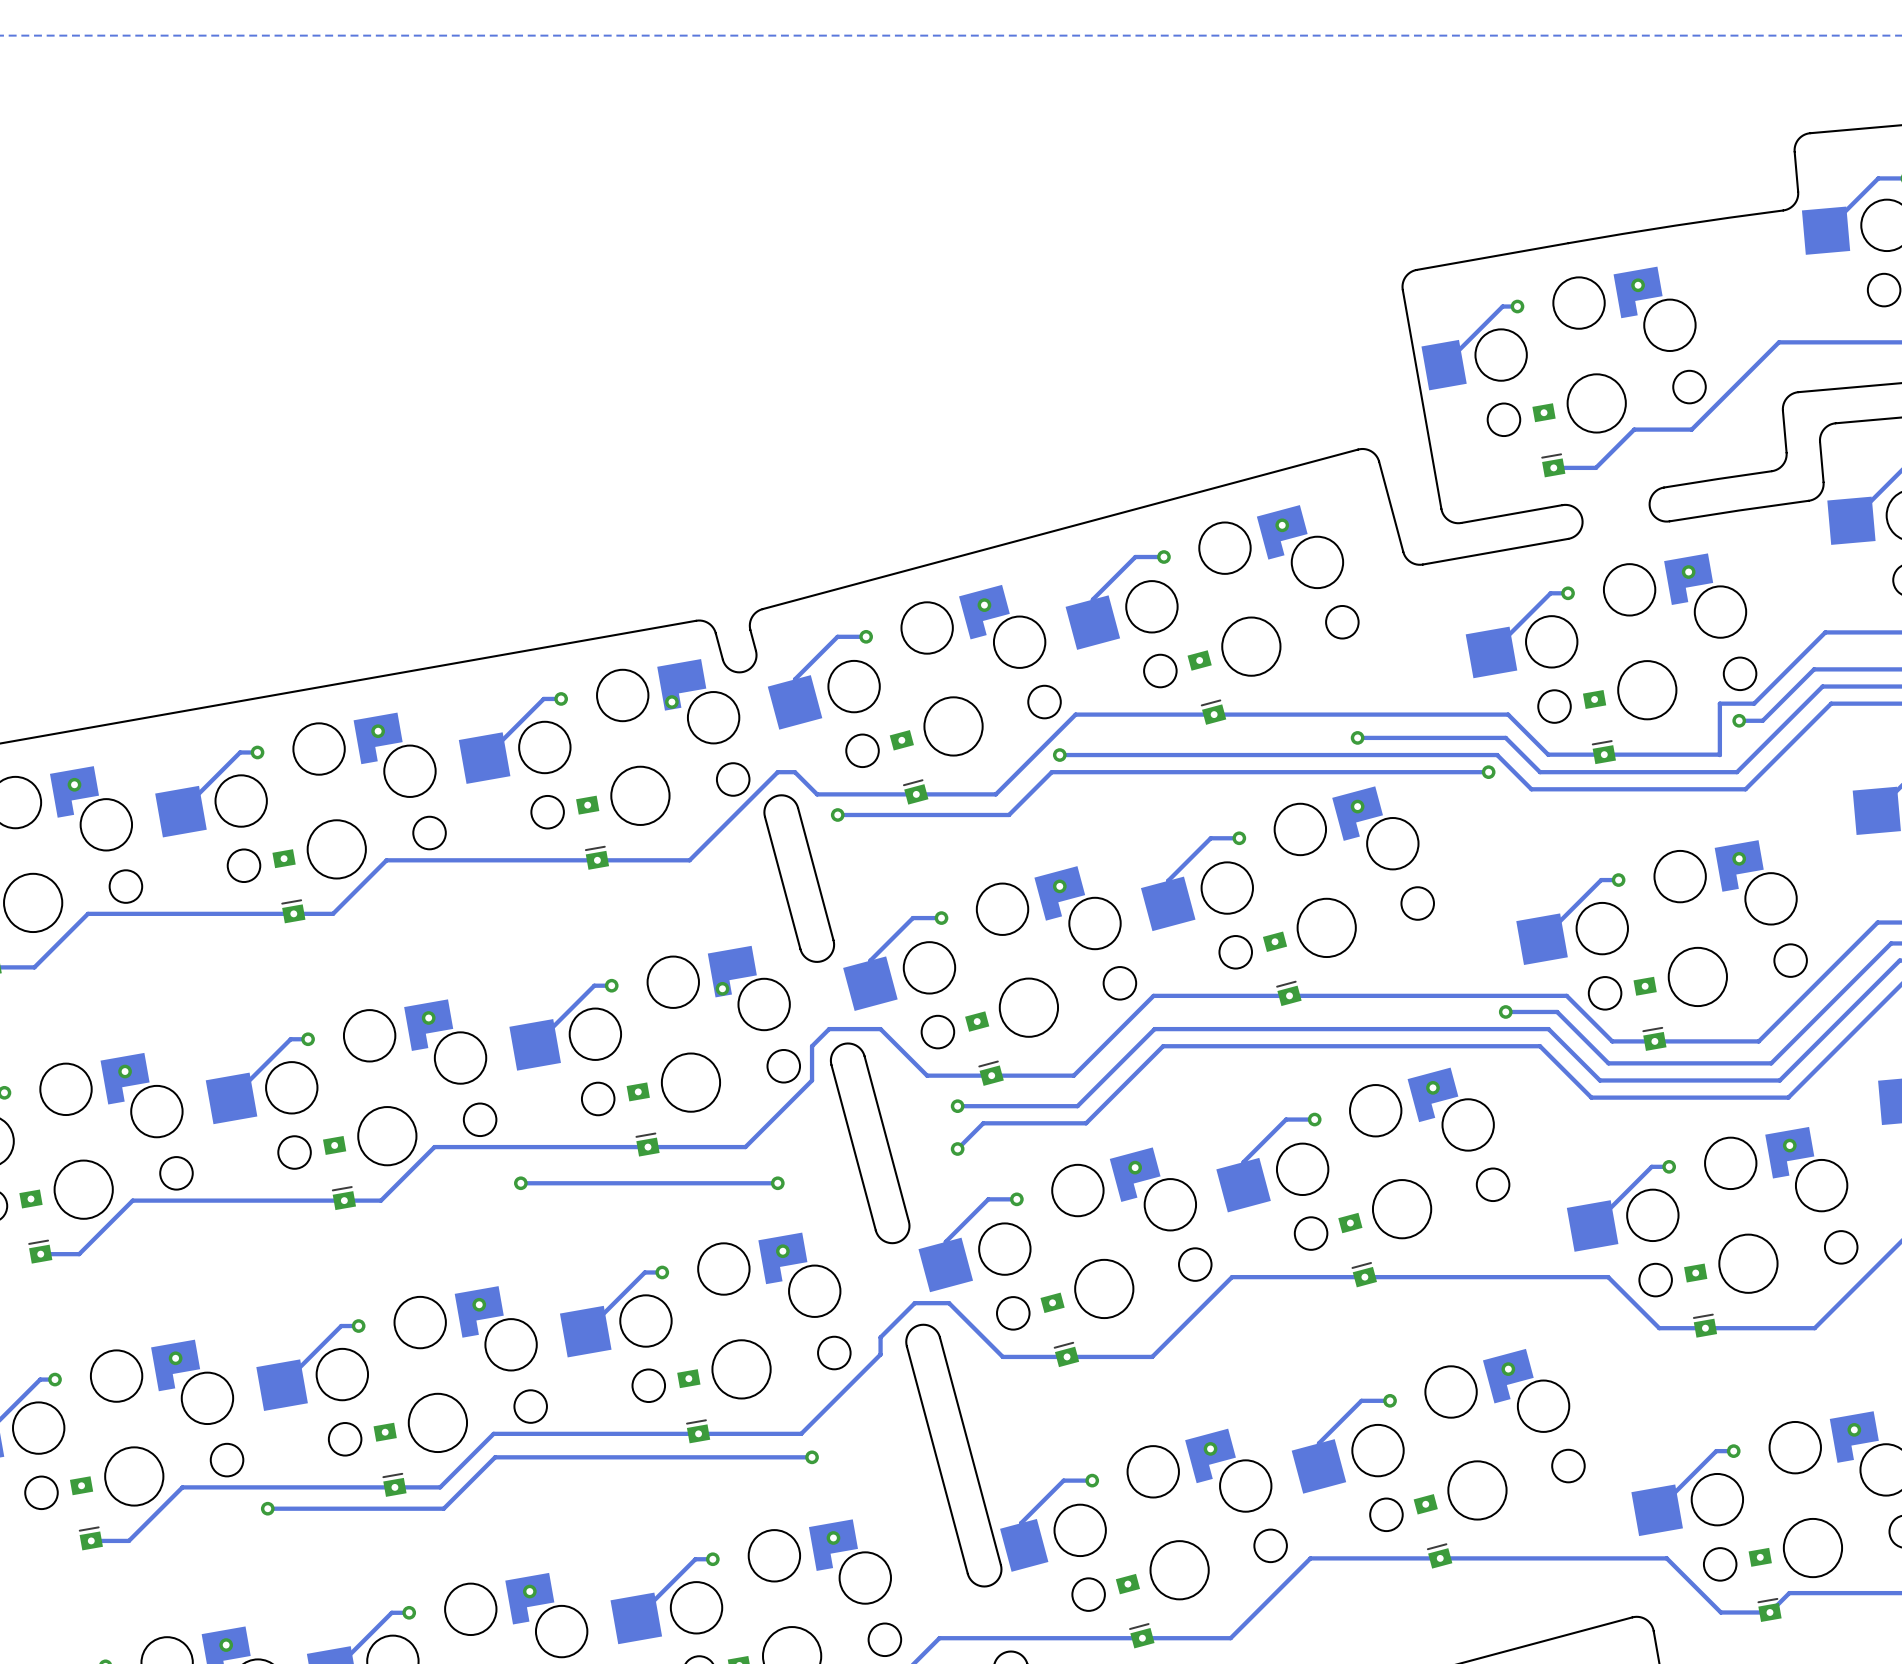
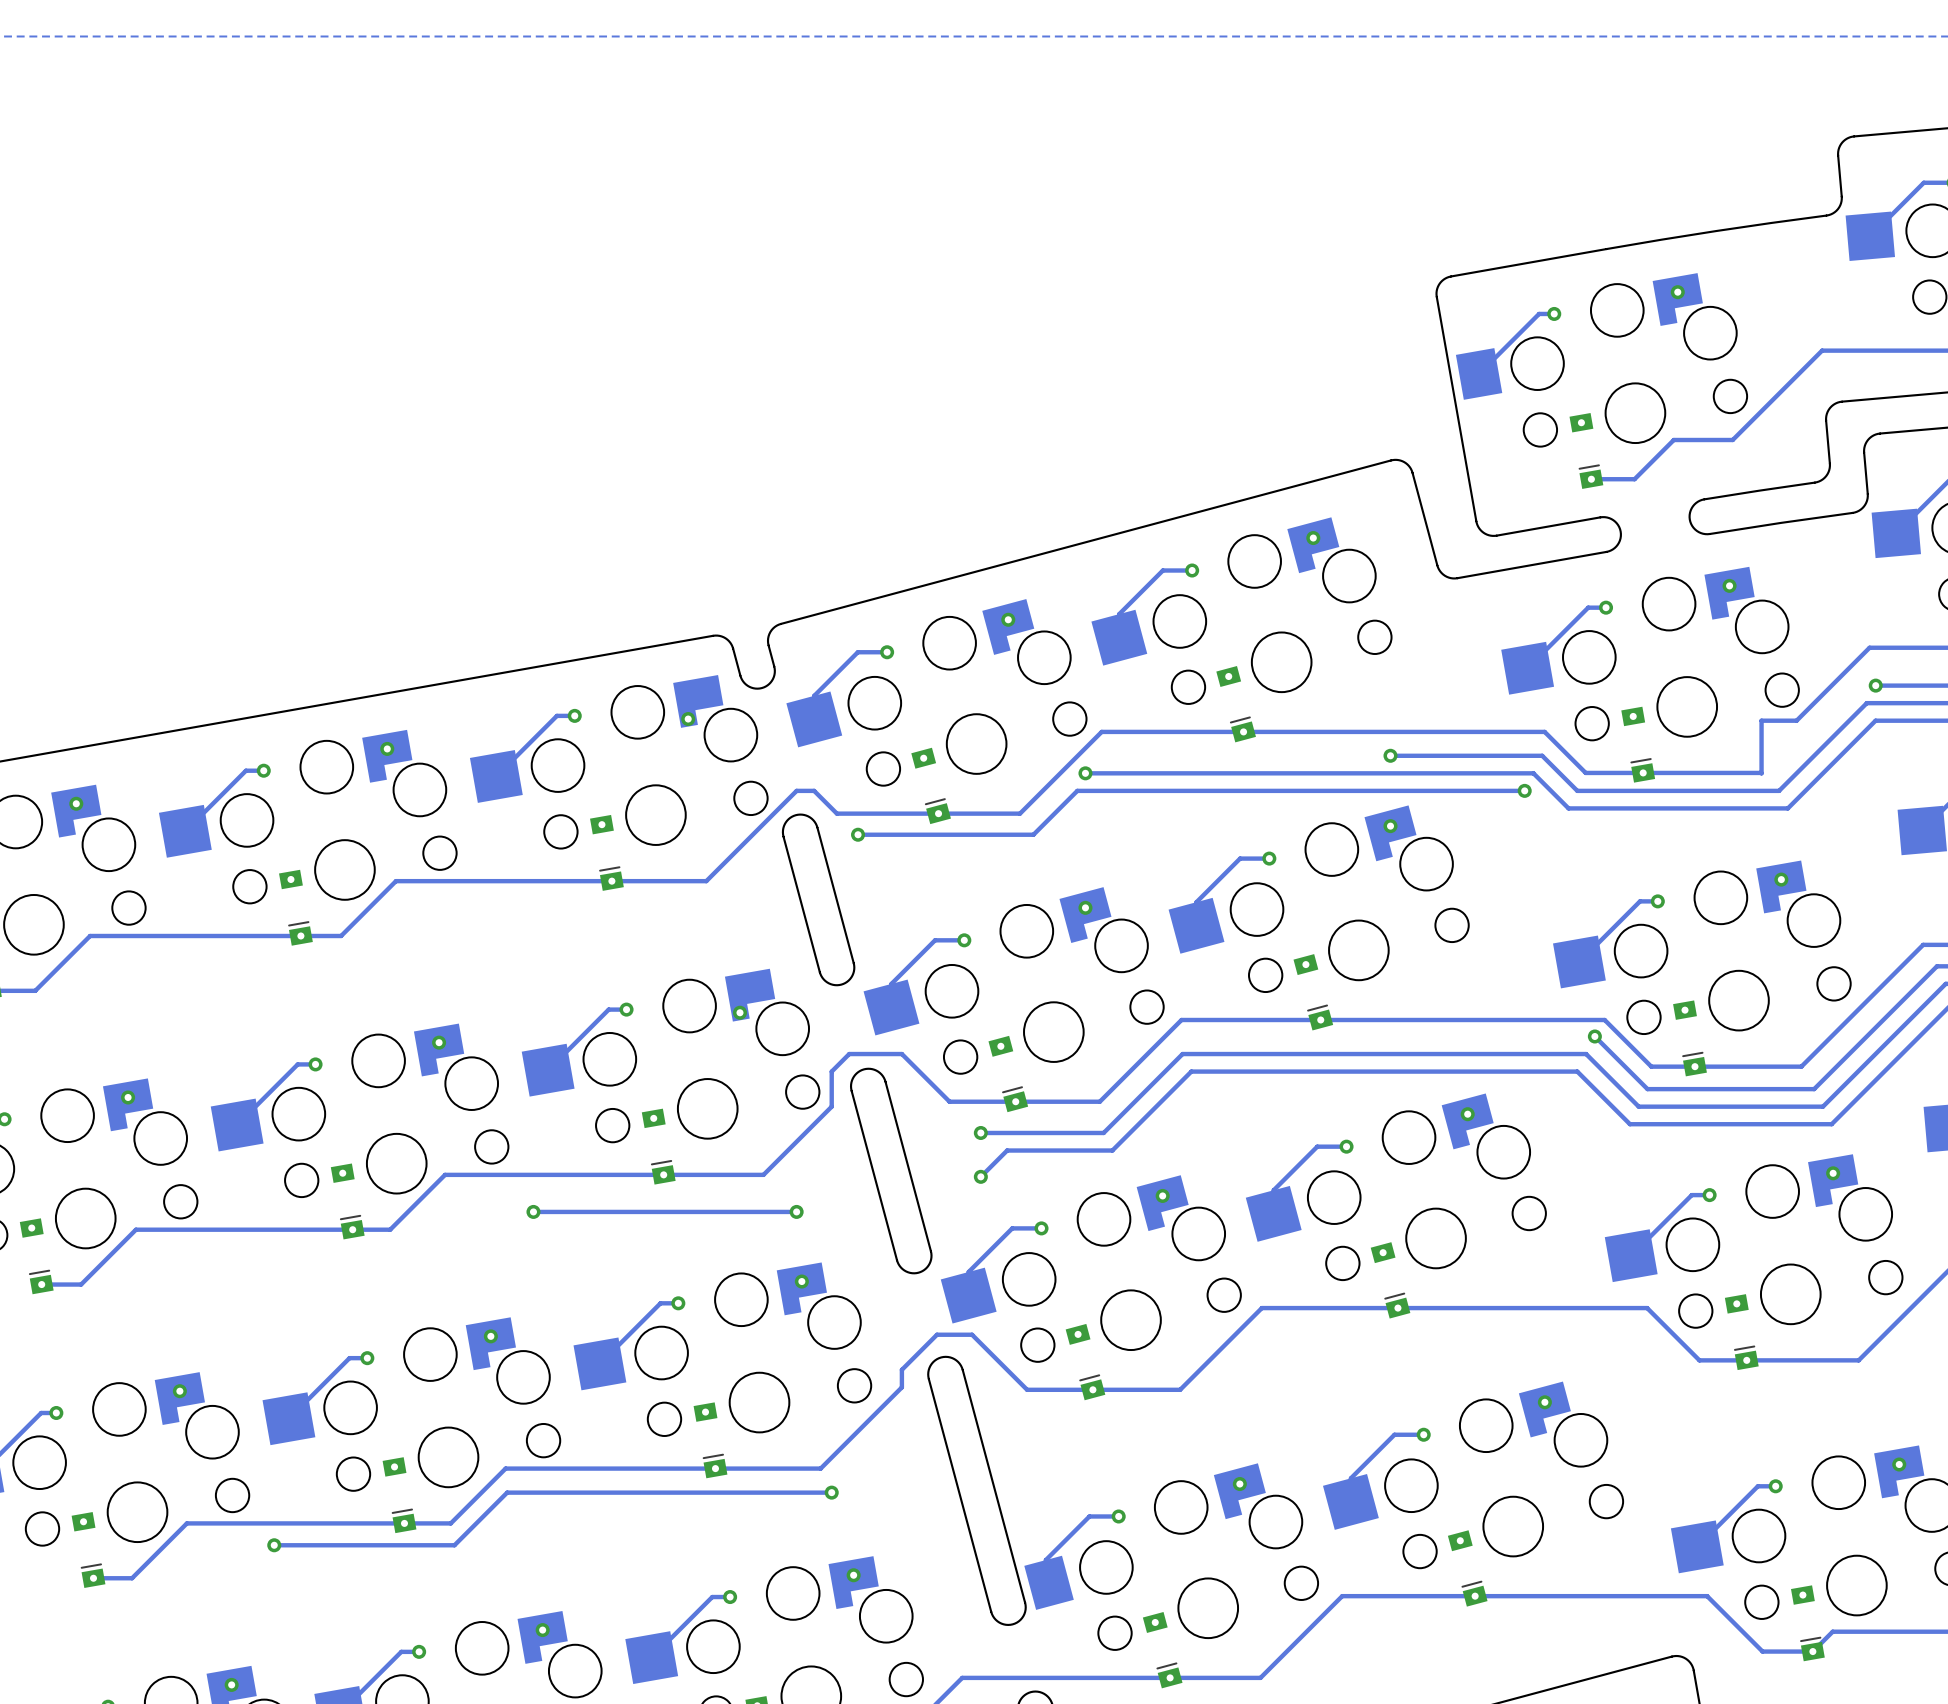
track: (1831, 669) (1814, 669) (1762, 720) (1739, 720) -> none
via: none -> (1875, 685)
via: (1739, 720) -> none
via position: (1505, 1011) -> (1594, 1036)
track: (1557, 1011) (1505, 1011) -> none

